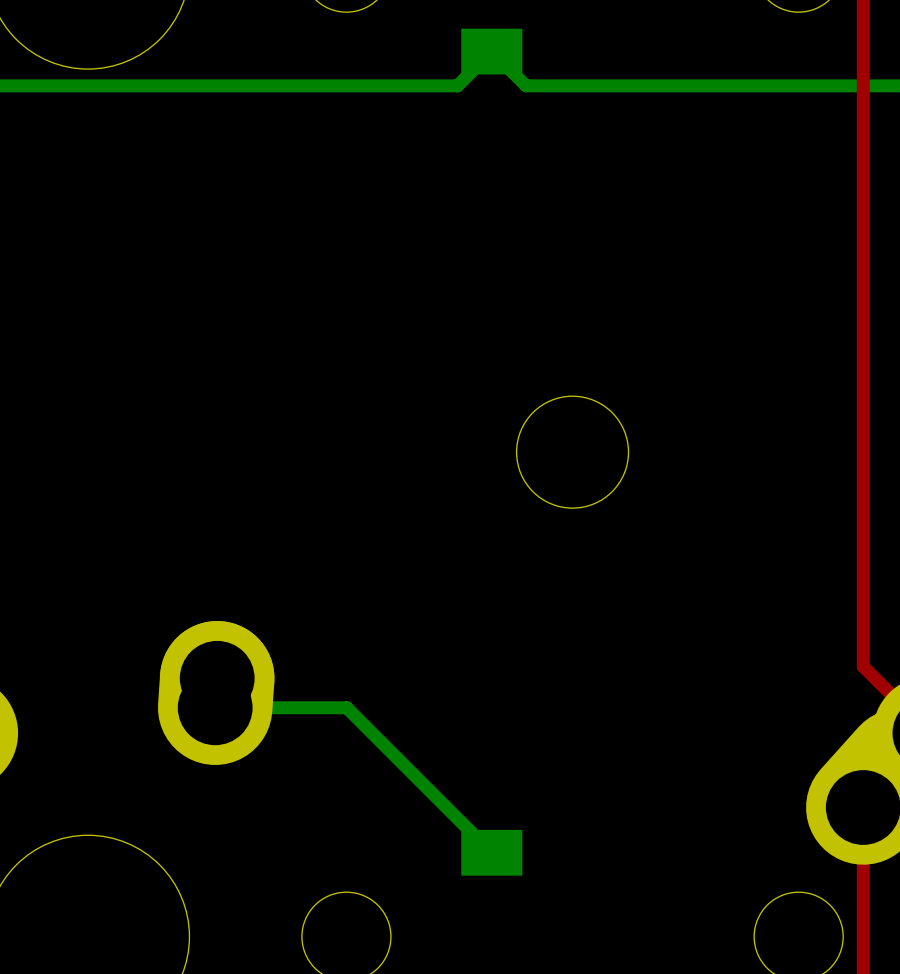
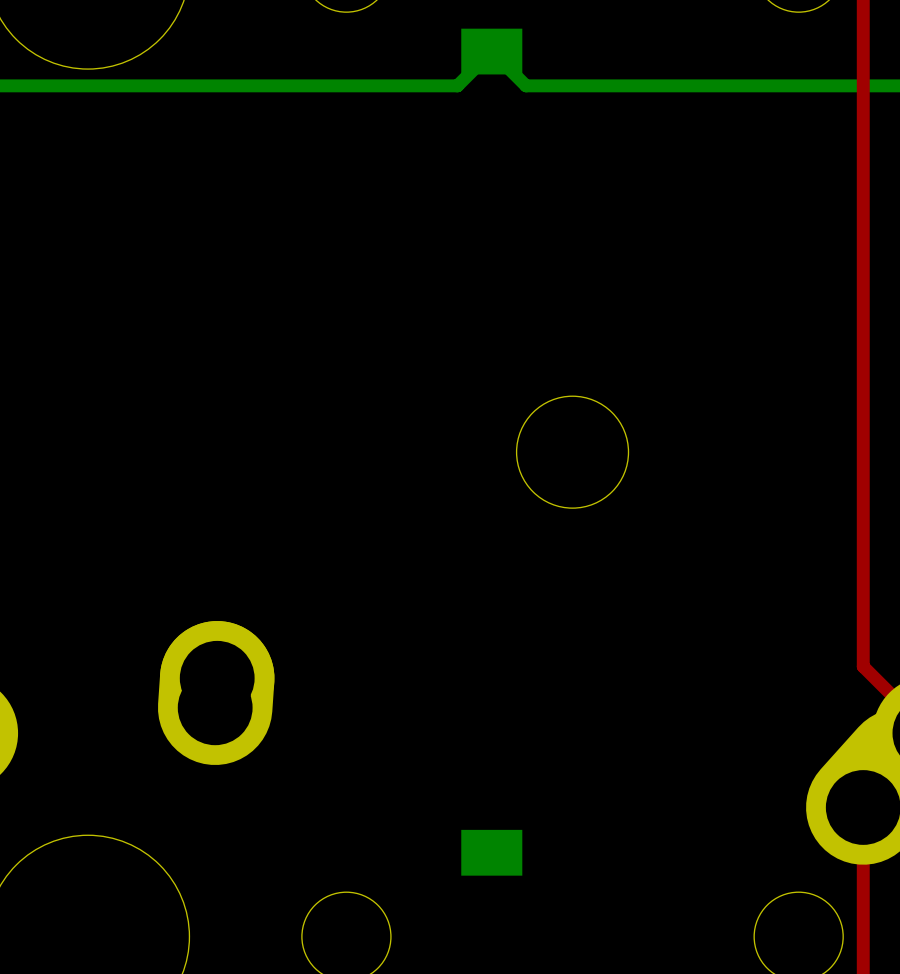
bottom track: (215, 707) (346, 707) (491, 852) -> none

